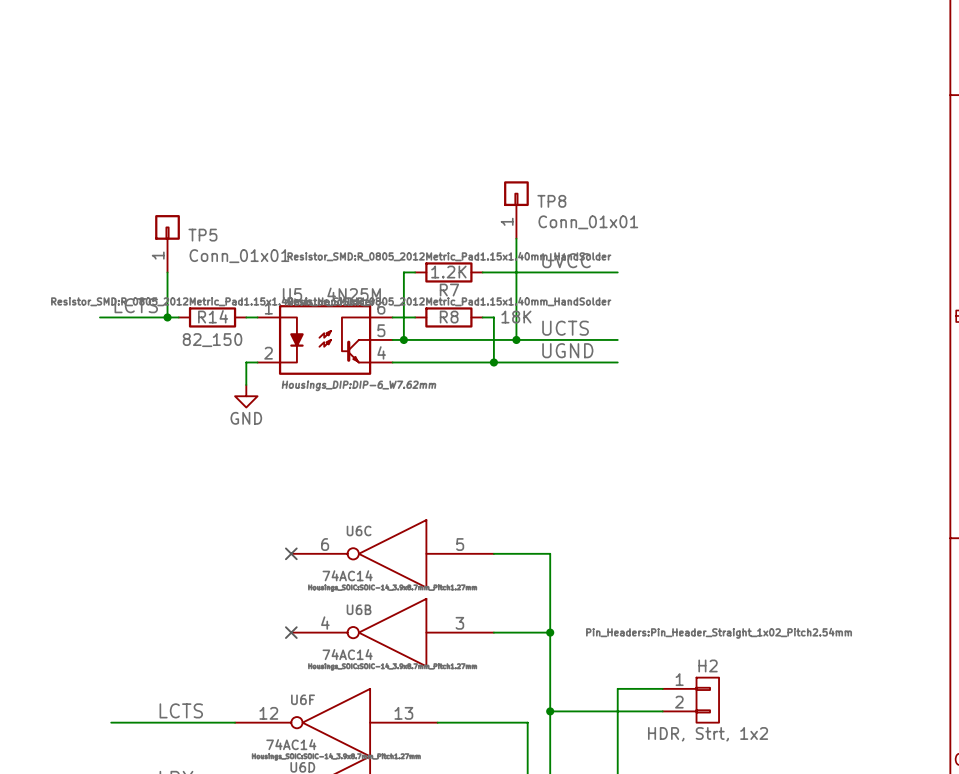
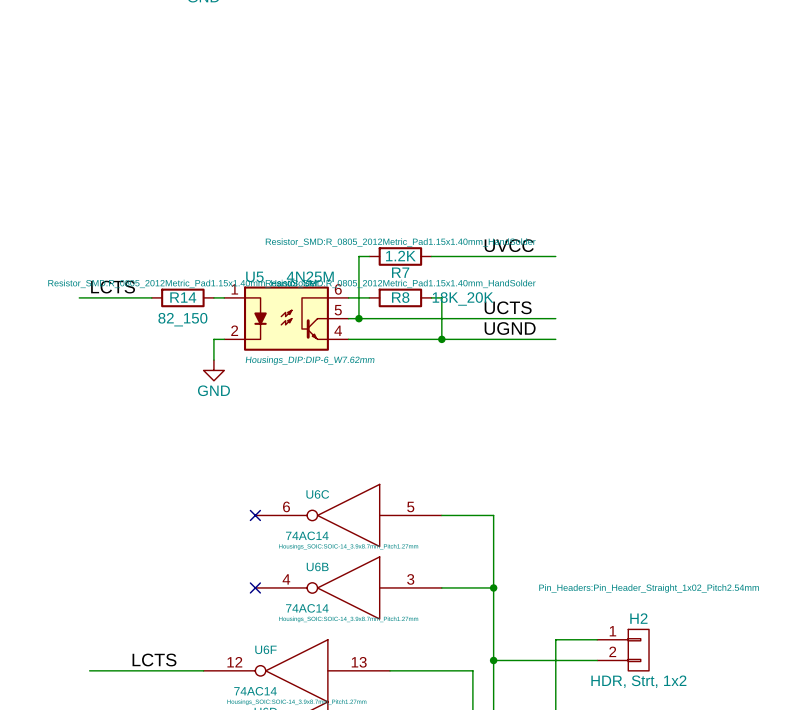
TP8: Conn_01x01 (516, 209) -> none
wire: (516, 238) (516, 339) -> none
TP5: Conn_01x01 (167, 243) -> none
wire: (167, 272) (167, 317) -> none
junction: (167, 317) -> none
R8 value: 18K (516, 317) -> 18K_20K (463, 298)
junction: (516, 339) -> none

